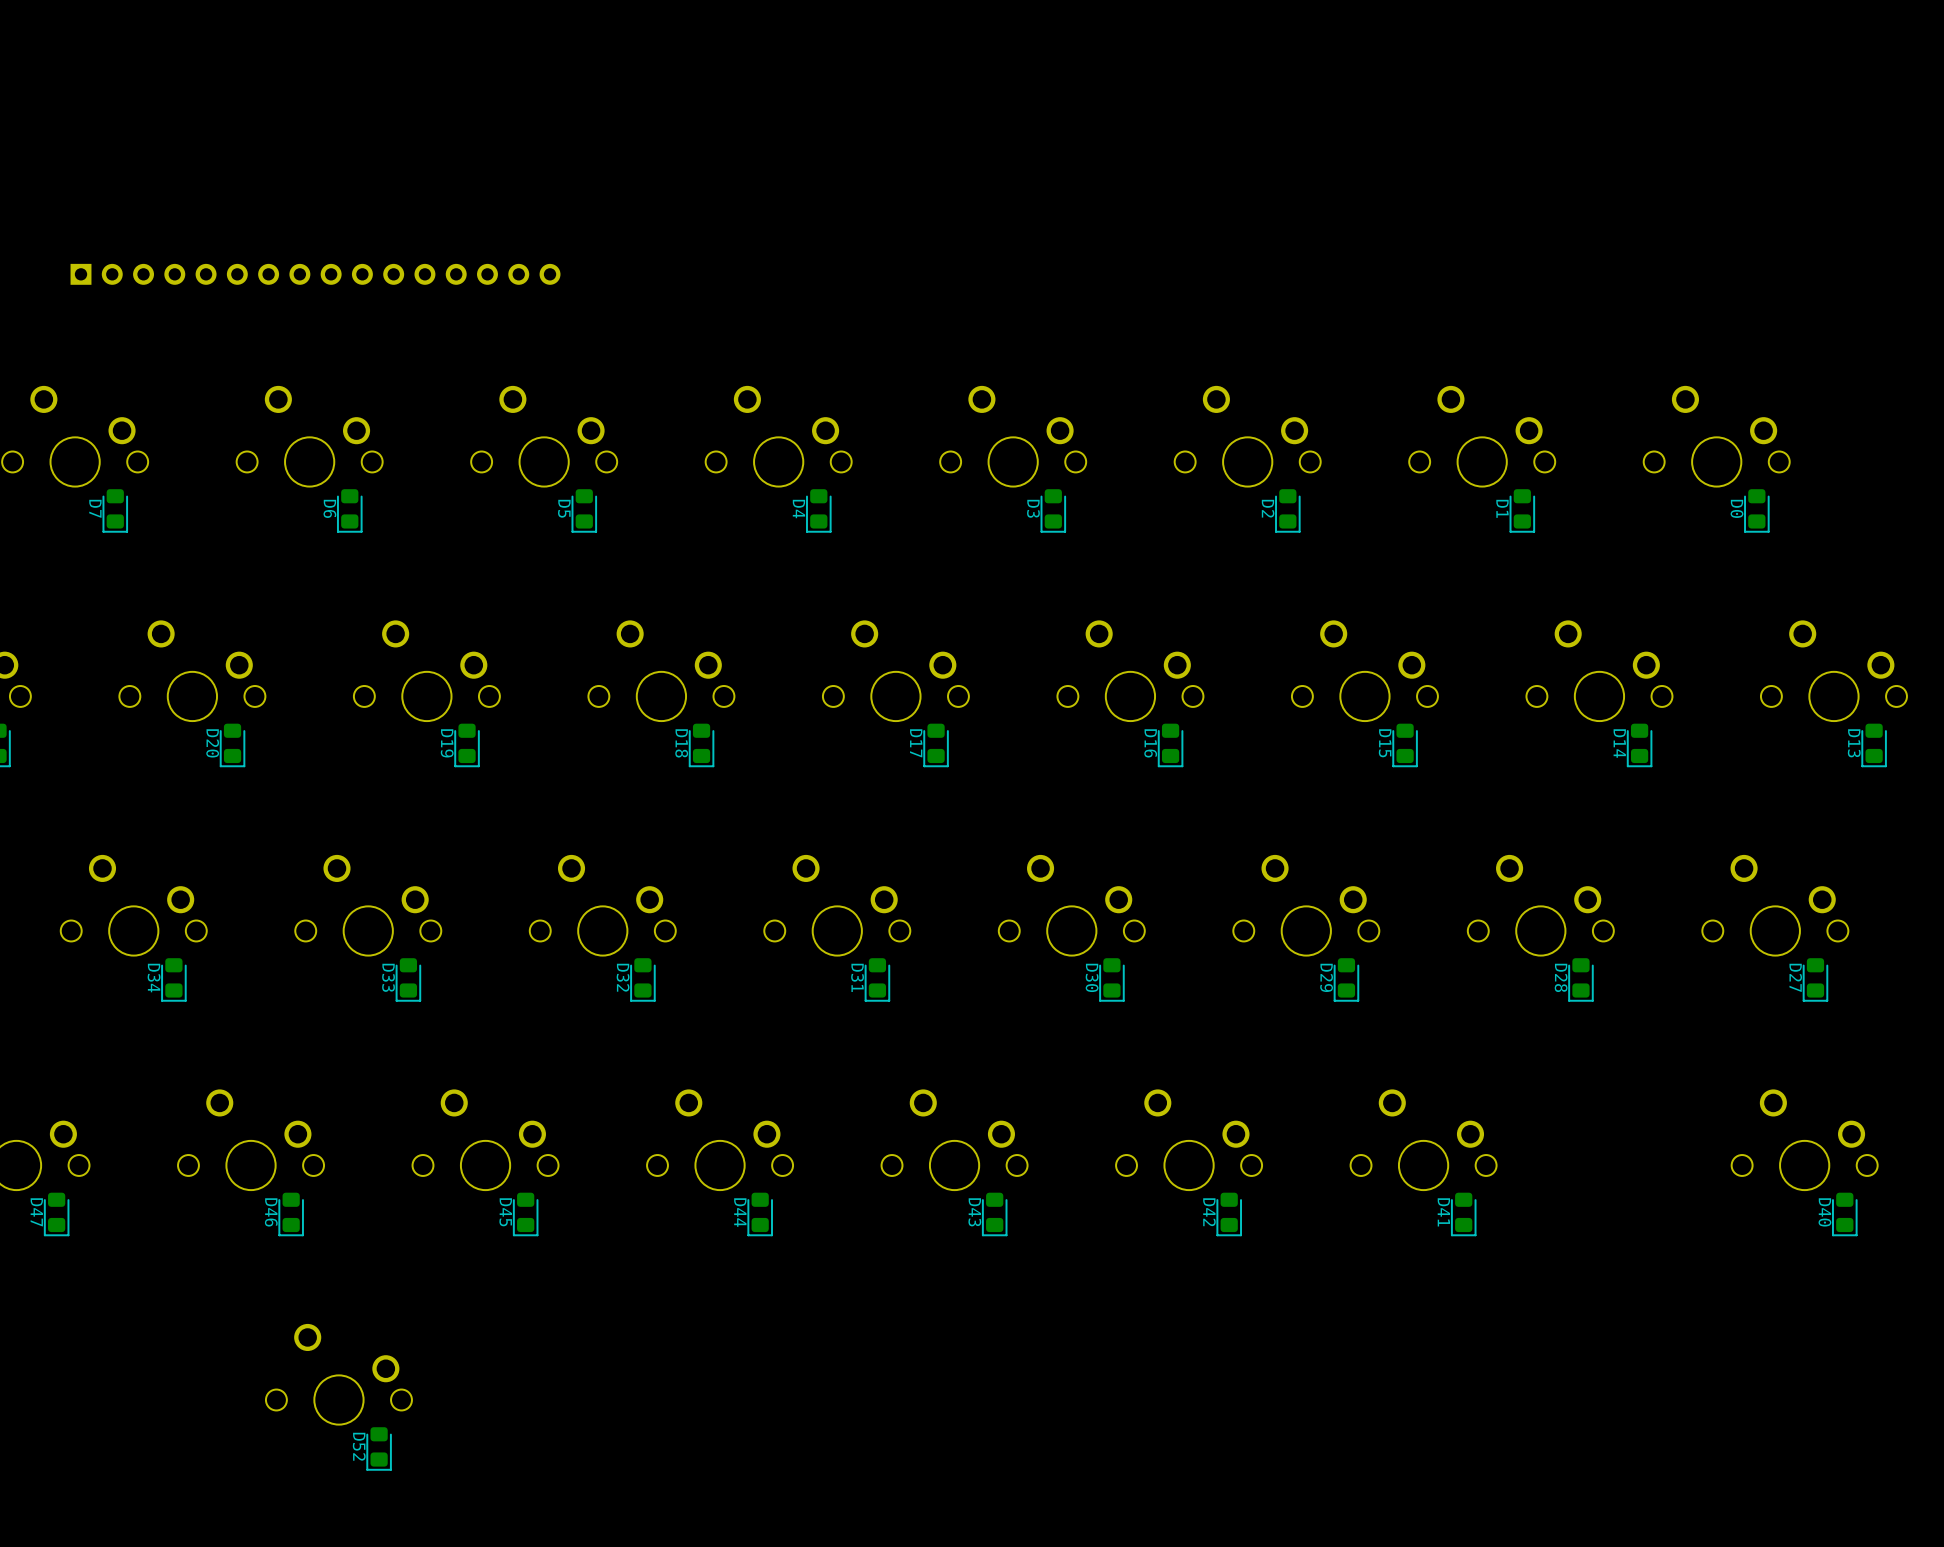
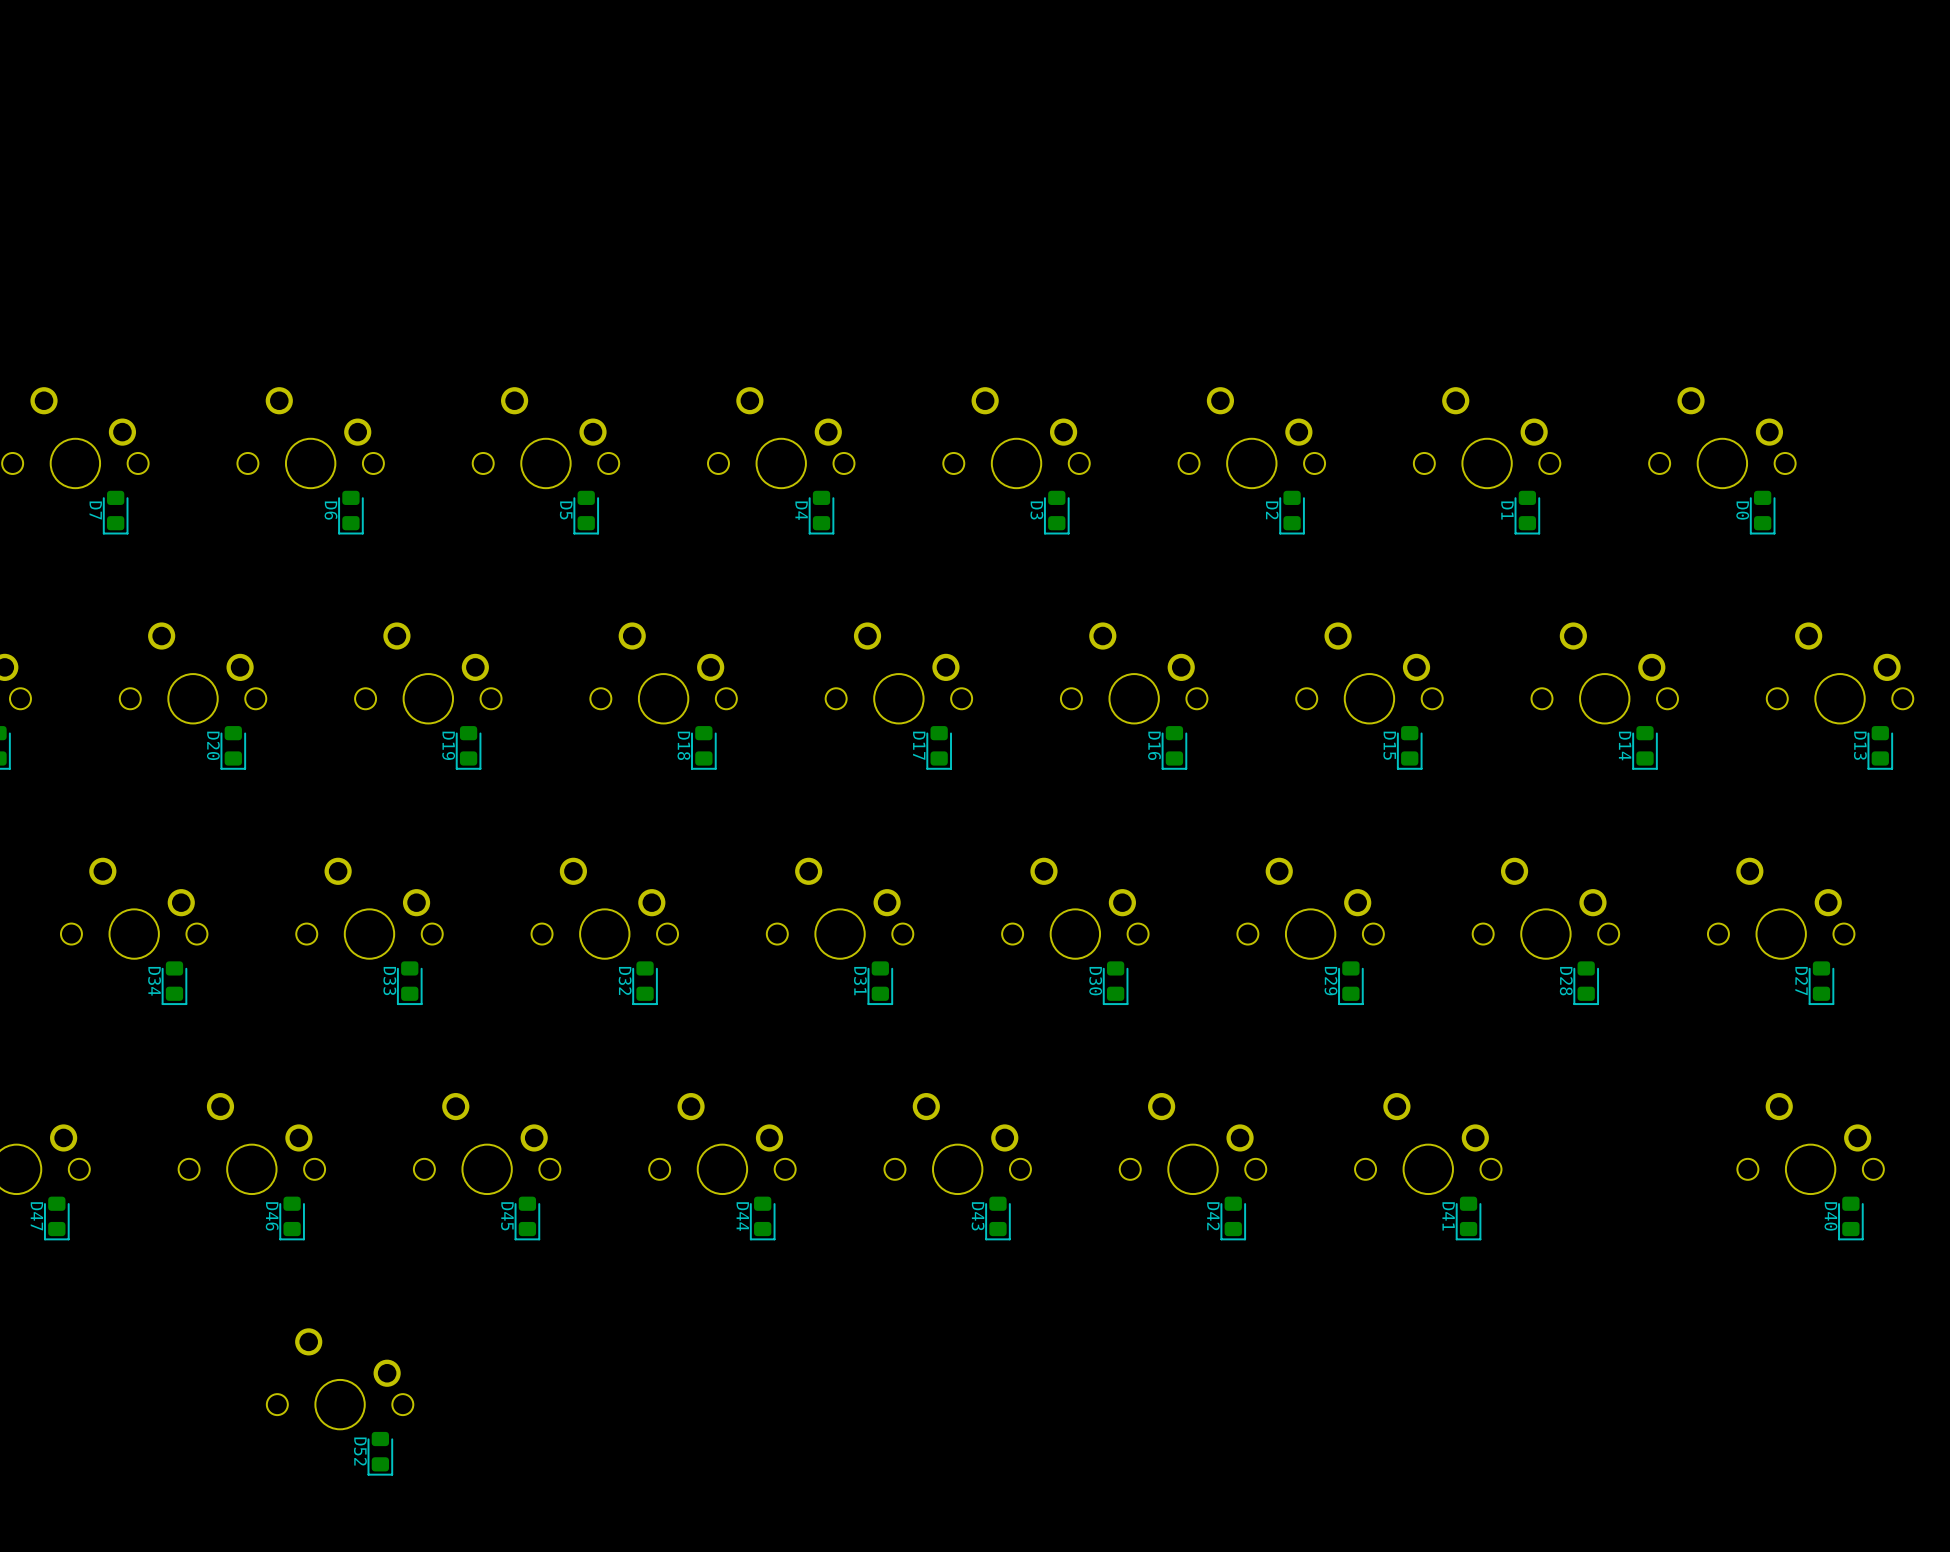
part: (315, 274) -> none

